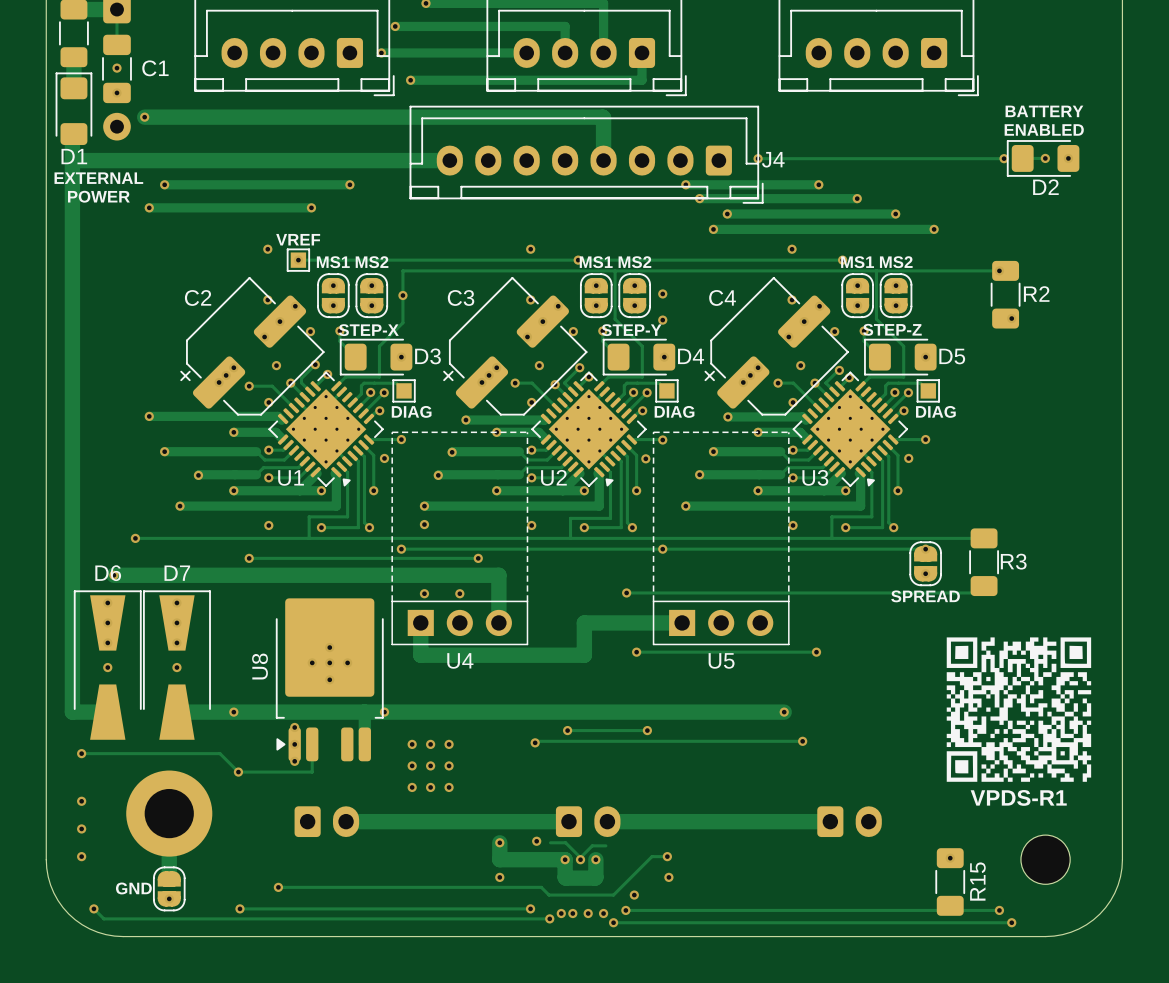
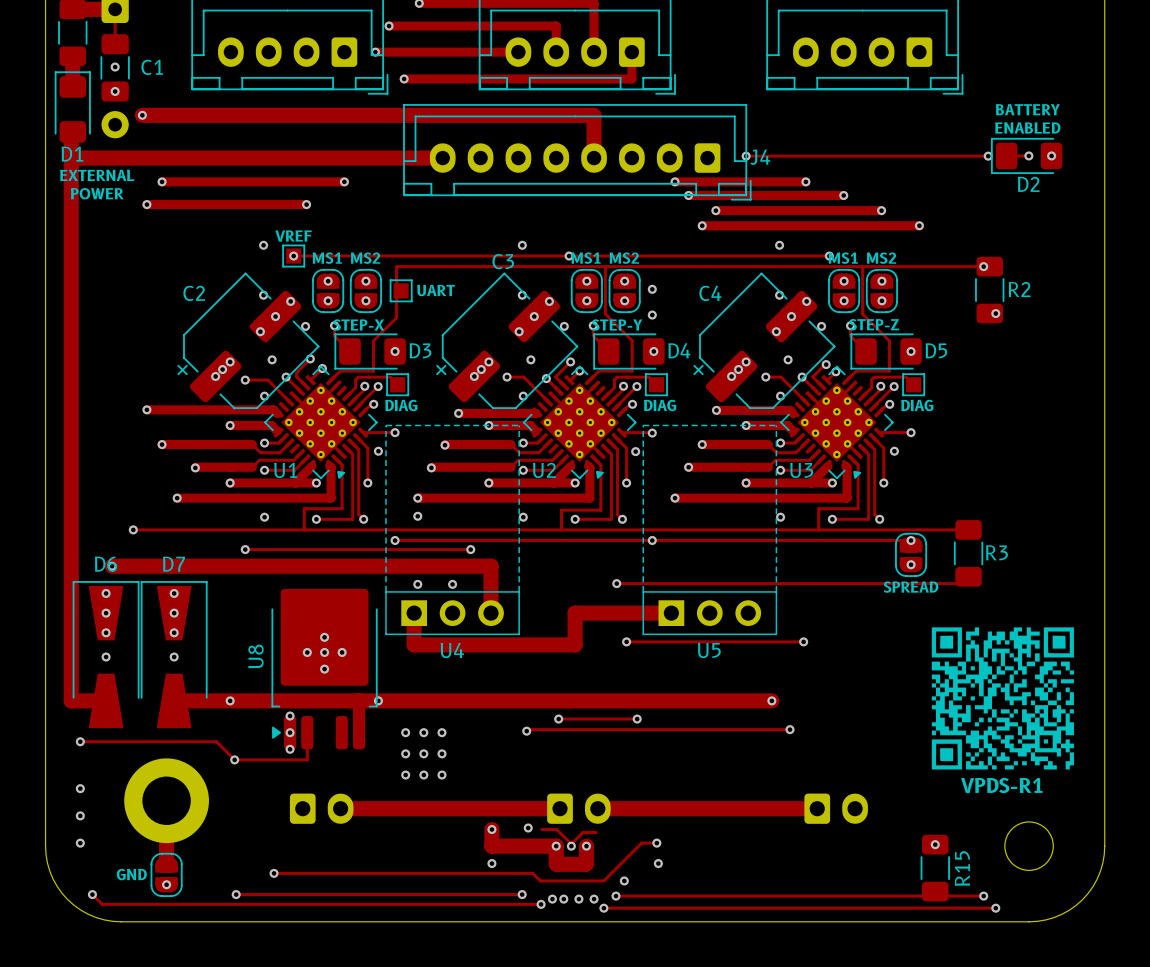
via: (402, 295) -> none
part: none -> (401, 290)
text: none -> UART (436, 290)
C3 name position: C3 (461, 297) -> C3 (503, 261)

